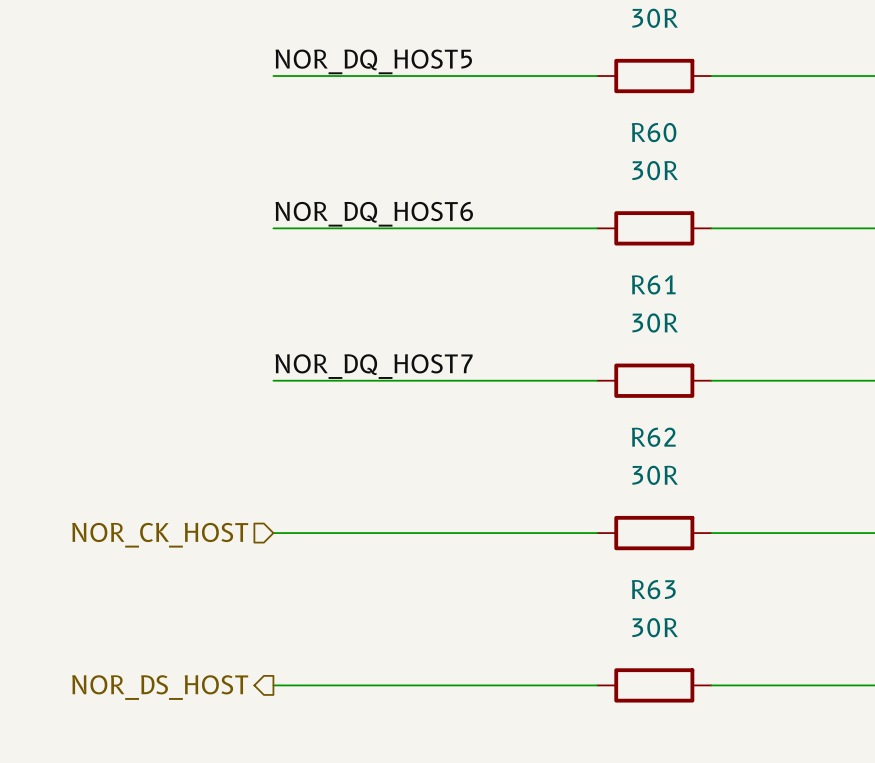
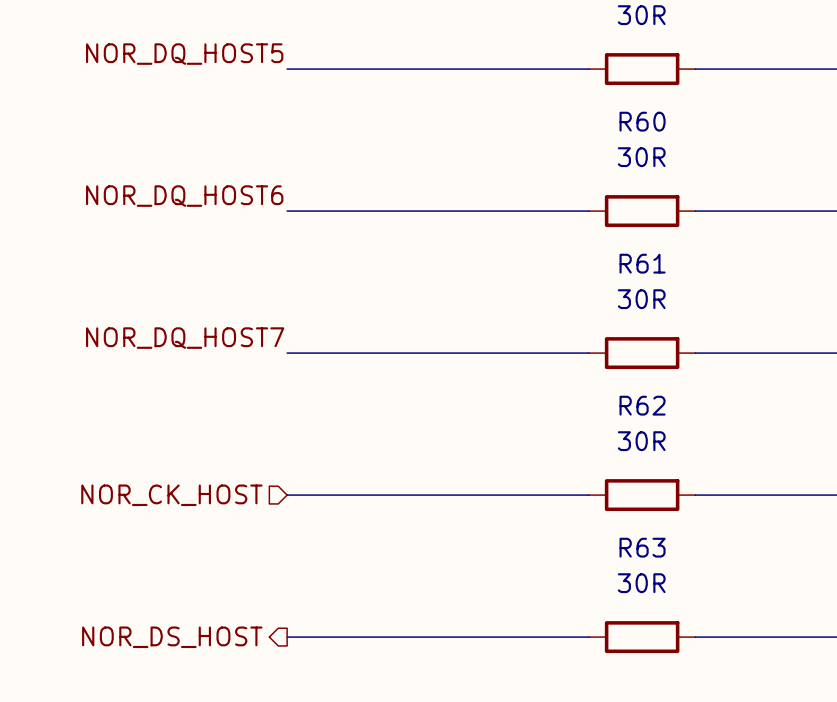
label position: NOR_DQ_HOST5 (373, 61) -> NOR_DQ_HOST5 (184, 54)
label position: NOR_DQ_HOST6 (374, 214) -> NOR_DQ_HOST6 (184, 196)
label position: NOR_DQ_HOST7 (374, 366) -> NOR_DQ_HOST7 (185, 338)

